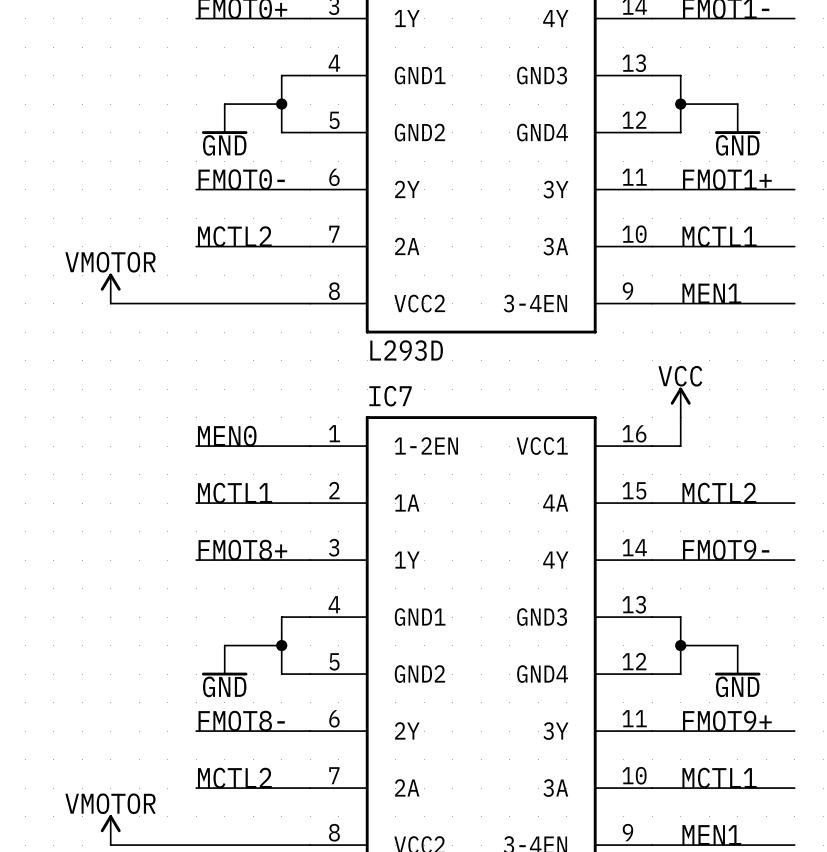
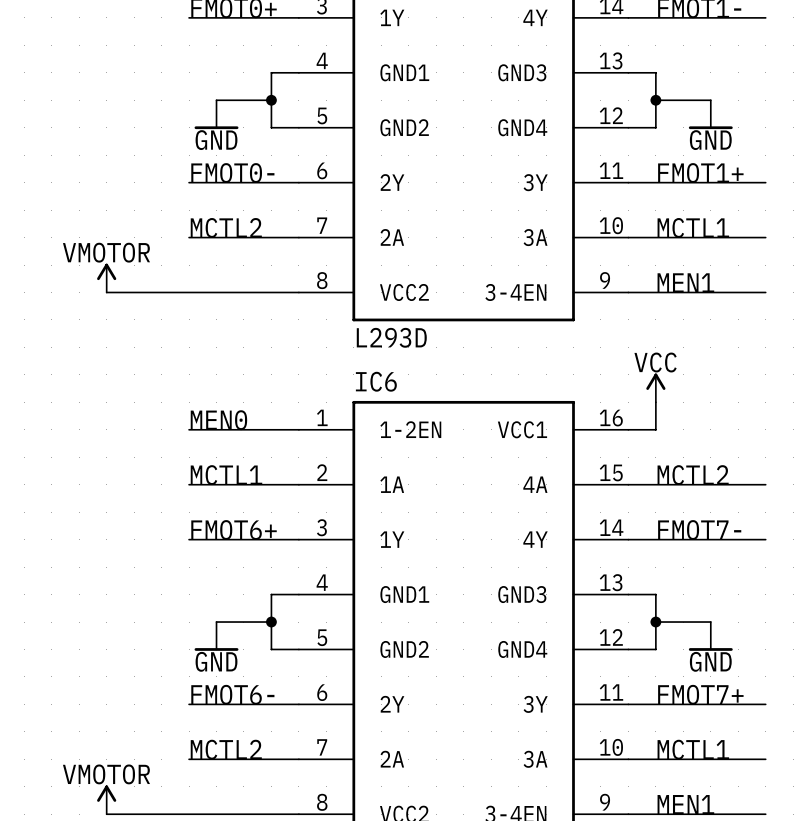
IC7 name: IC7 (390, 396) -> IC6 (376, 381)
label: FMOT8+ (242, 550) -> FMOT6+ (234, 530)
label: FMOT9- (726, 550) -> FMOT7- (699, 530)
label: FMOT8- (241, 721) -> FMOT6- (232, 694)
label: FMOT9+ (727, 721) -> FMOT7+ (700, 694)

